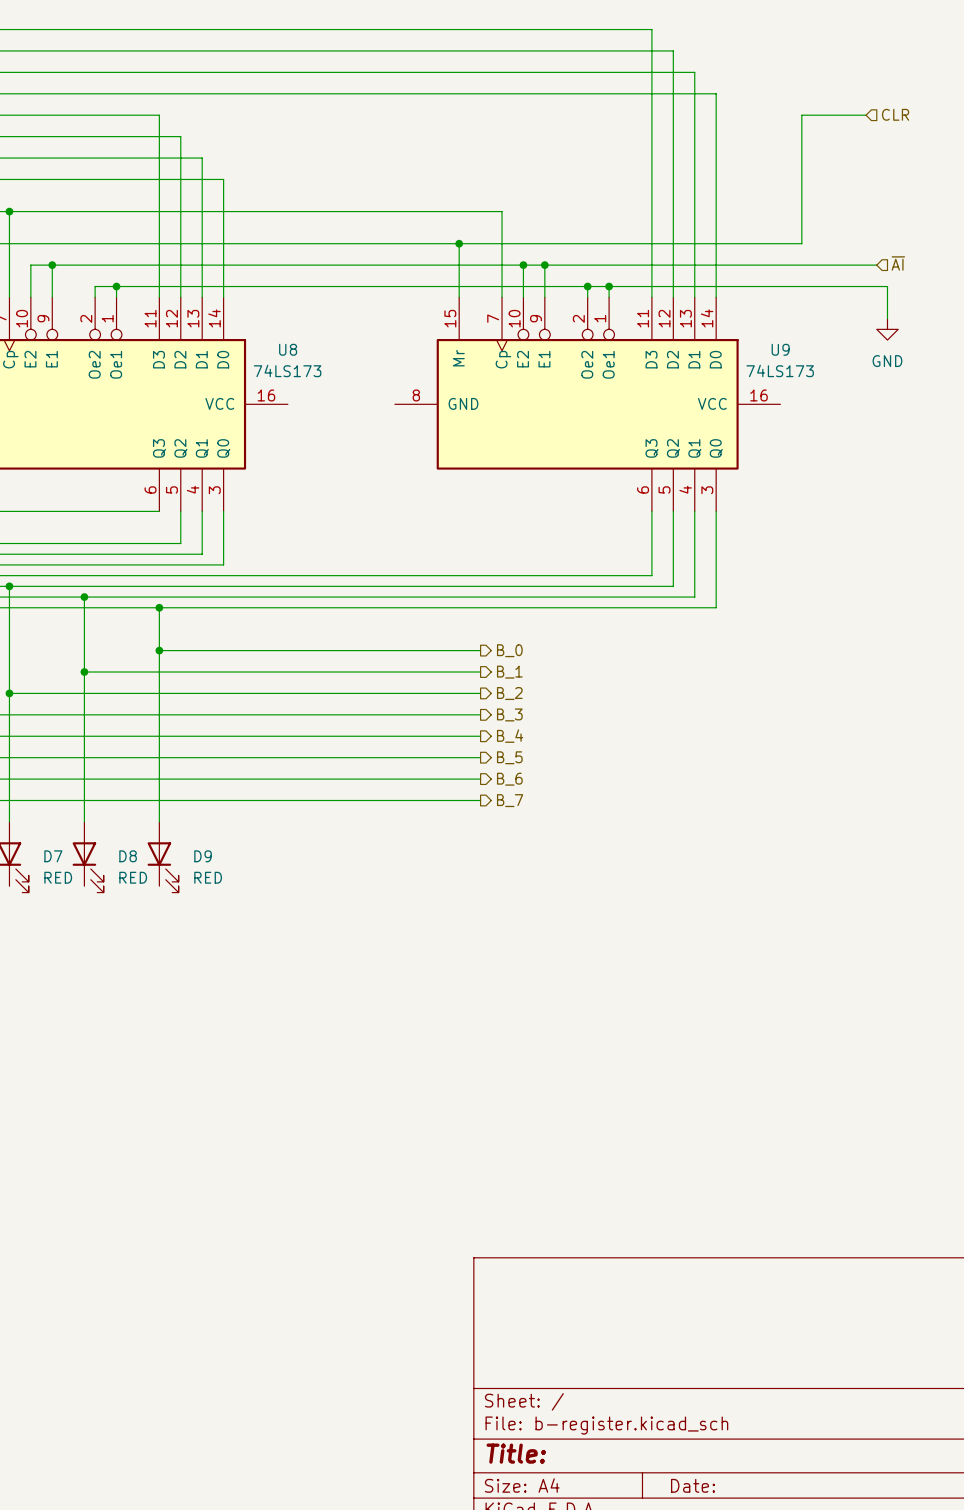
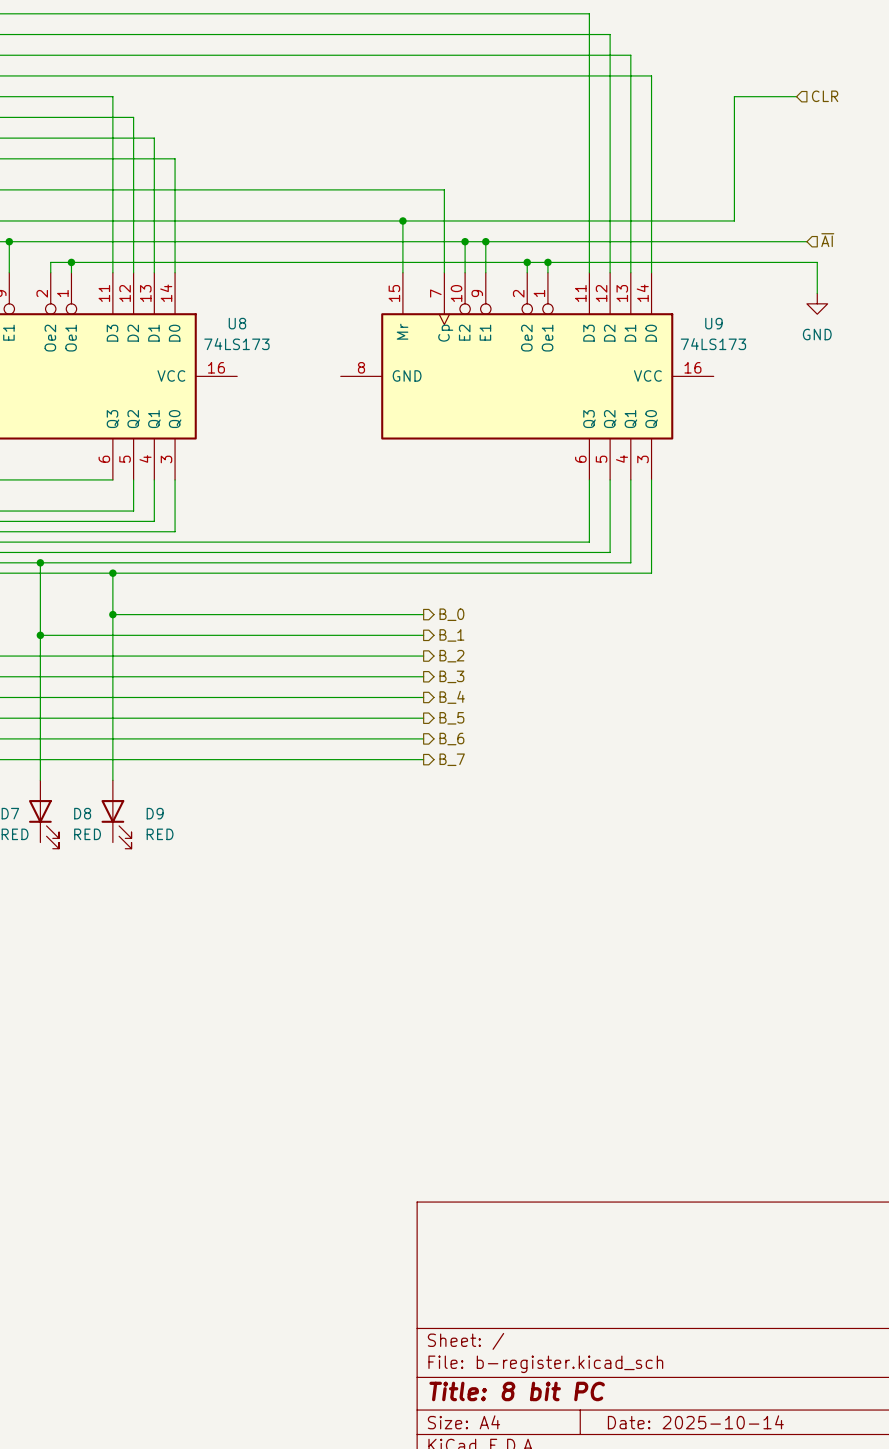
title block: Title: (516, 1453) -> Title: 8 bit PC (517, 1391)
title block: Date: (693, 1485) -> Date: 2025-10-14 (695, 1422)

